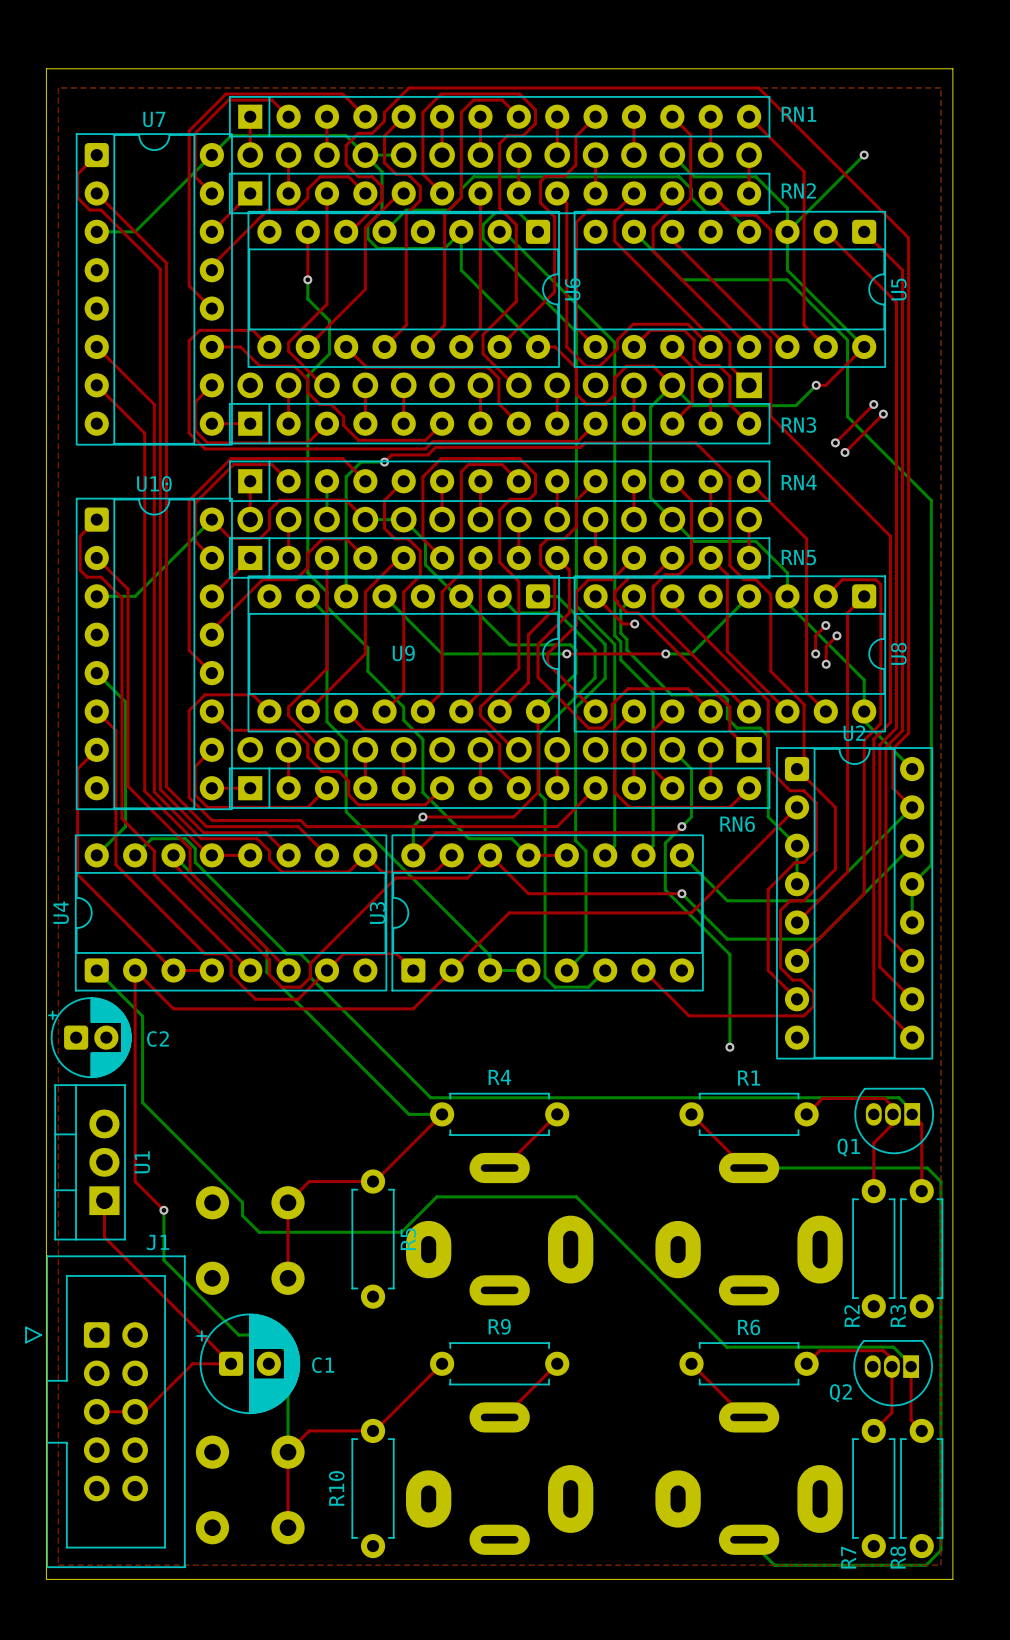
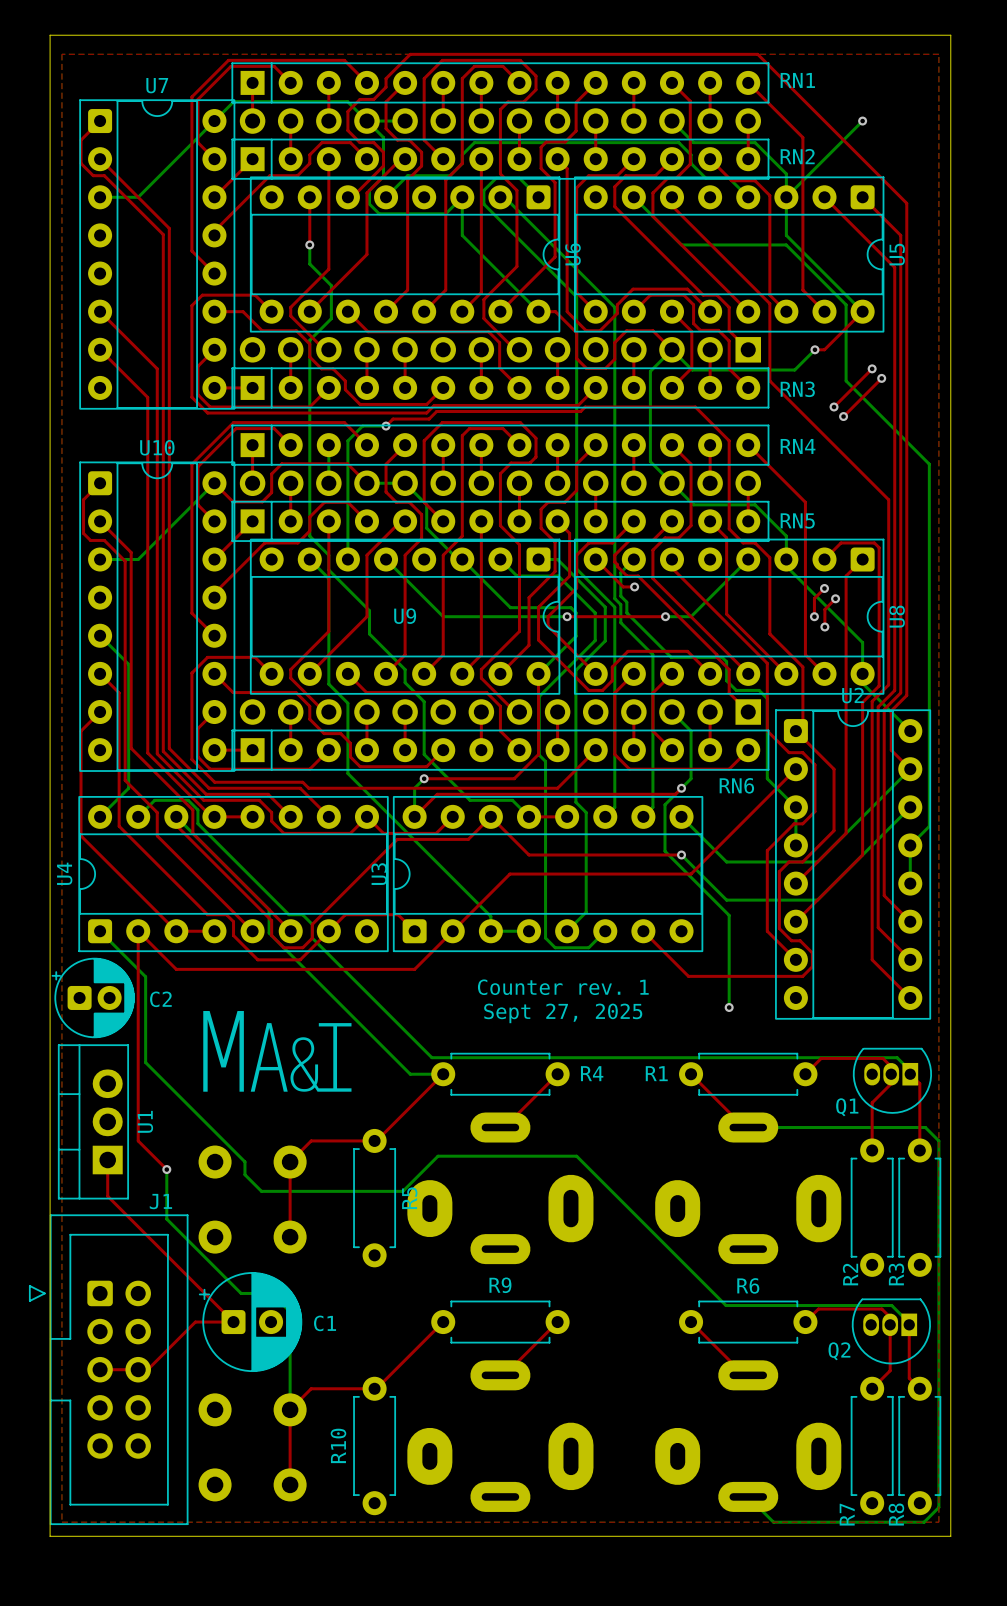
text: none -> Counter rev. 1 (563, 987)
drawing: none -> [203, 1010, 352, 1092]
text: none -> Sept 27, 2025 (563, 1013)
R4 name position: R4 (499, 1077) -> R4 (592, 1073)
R1 name position: R1 (749, 1078) -> R1 (656, 1073)

